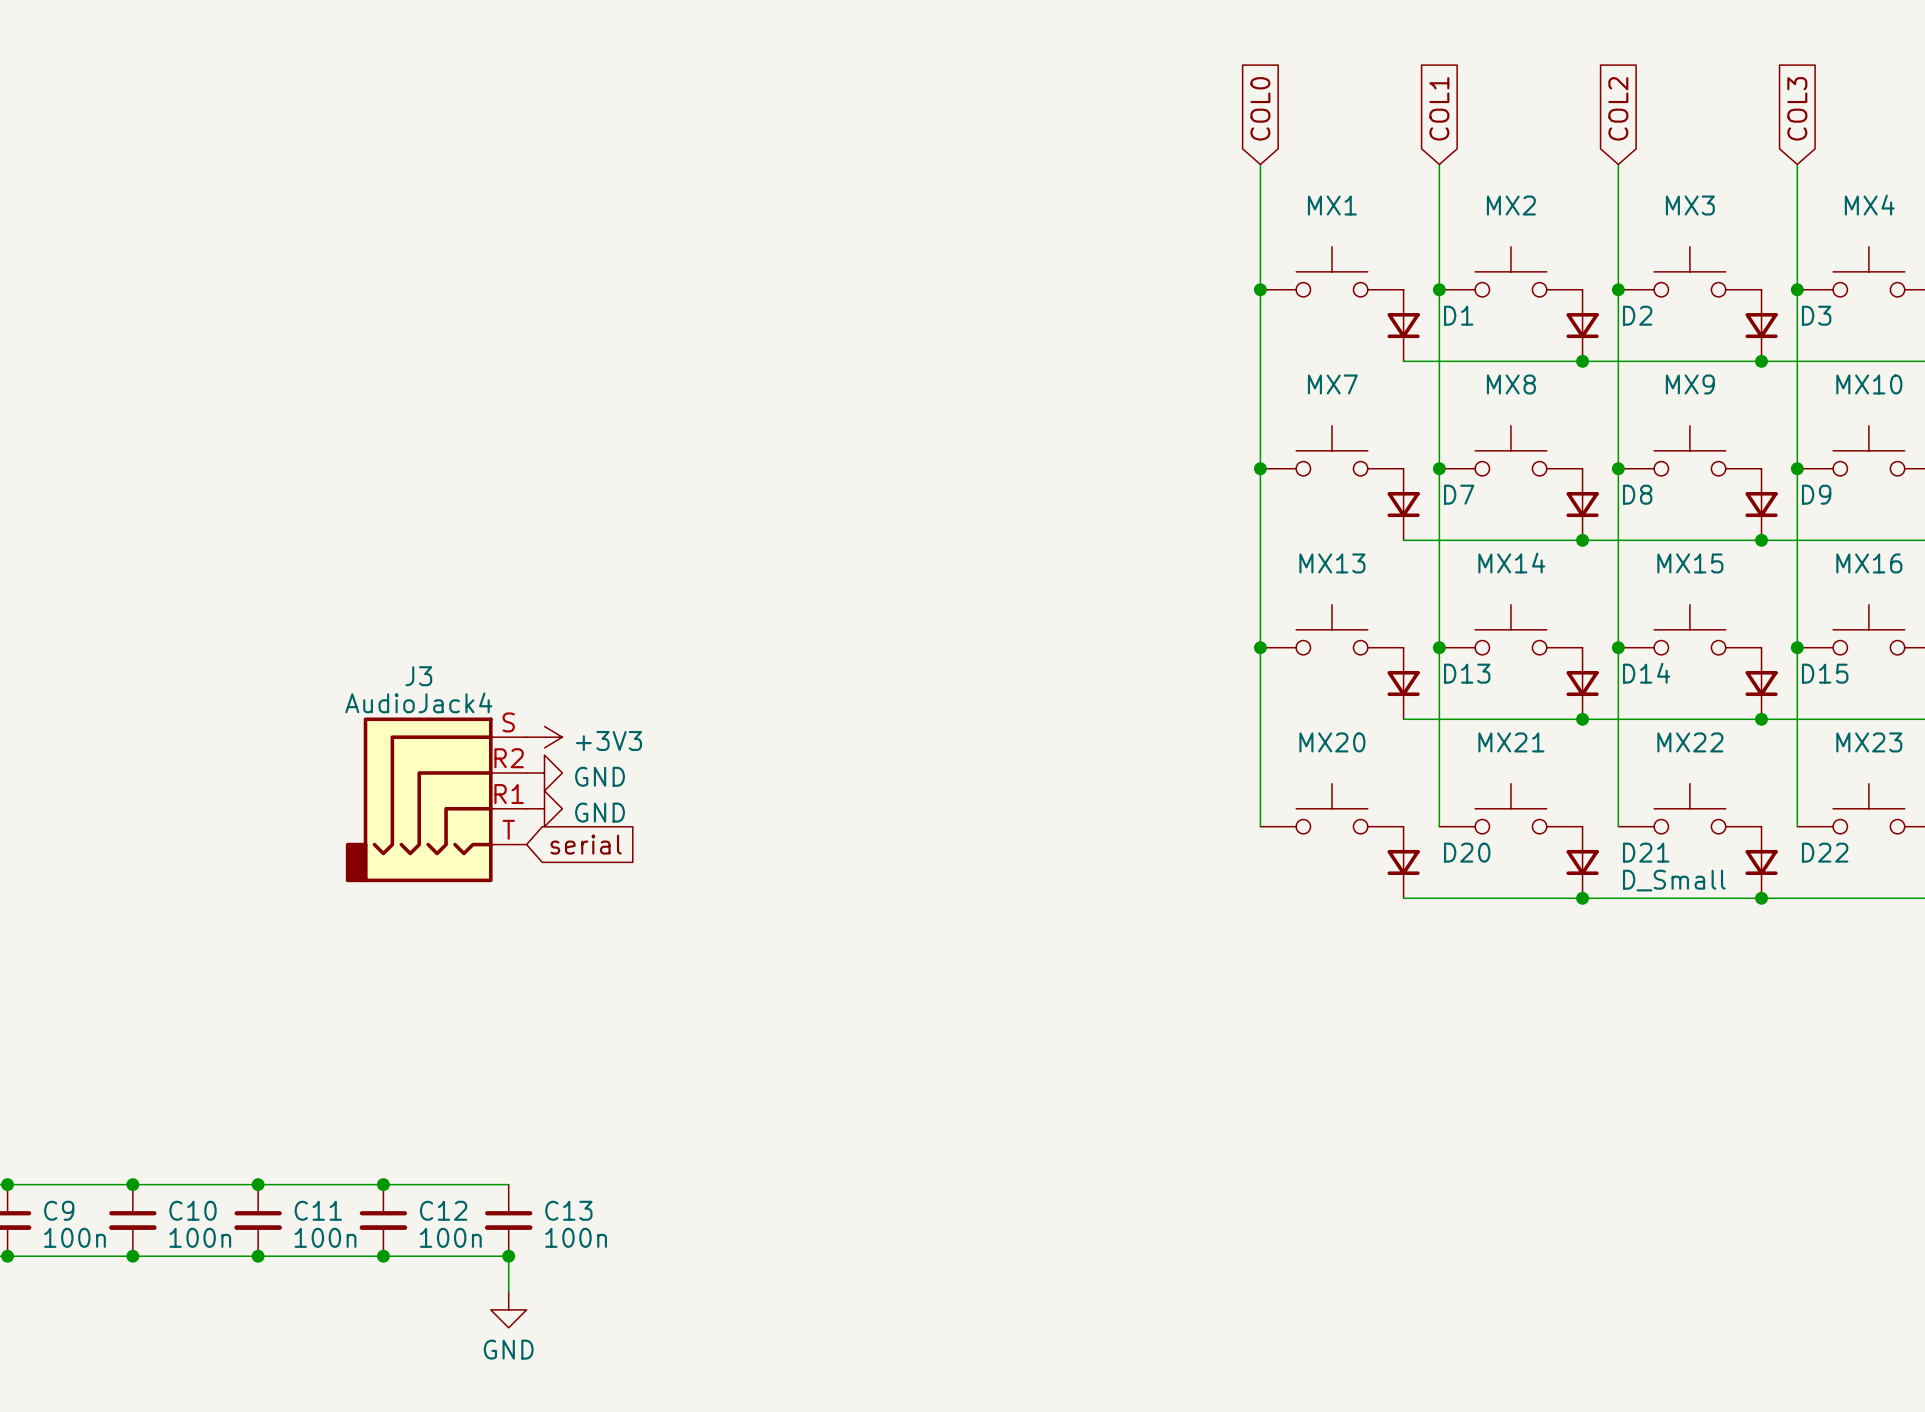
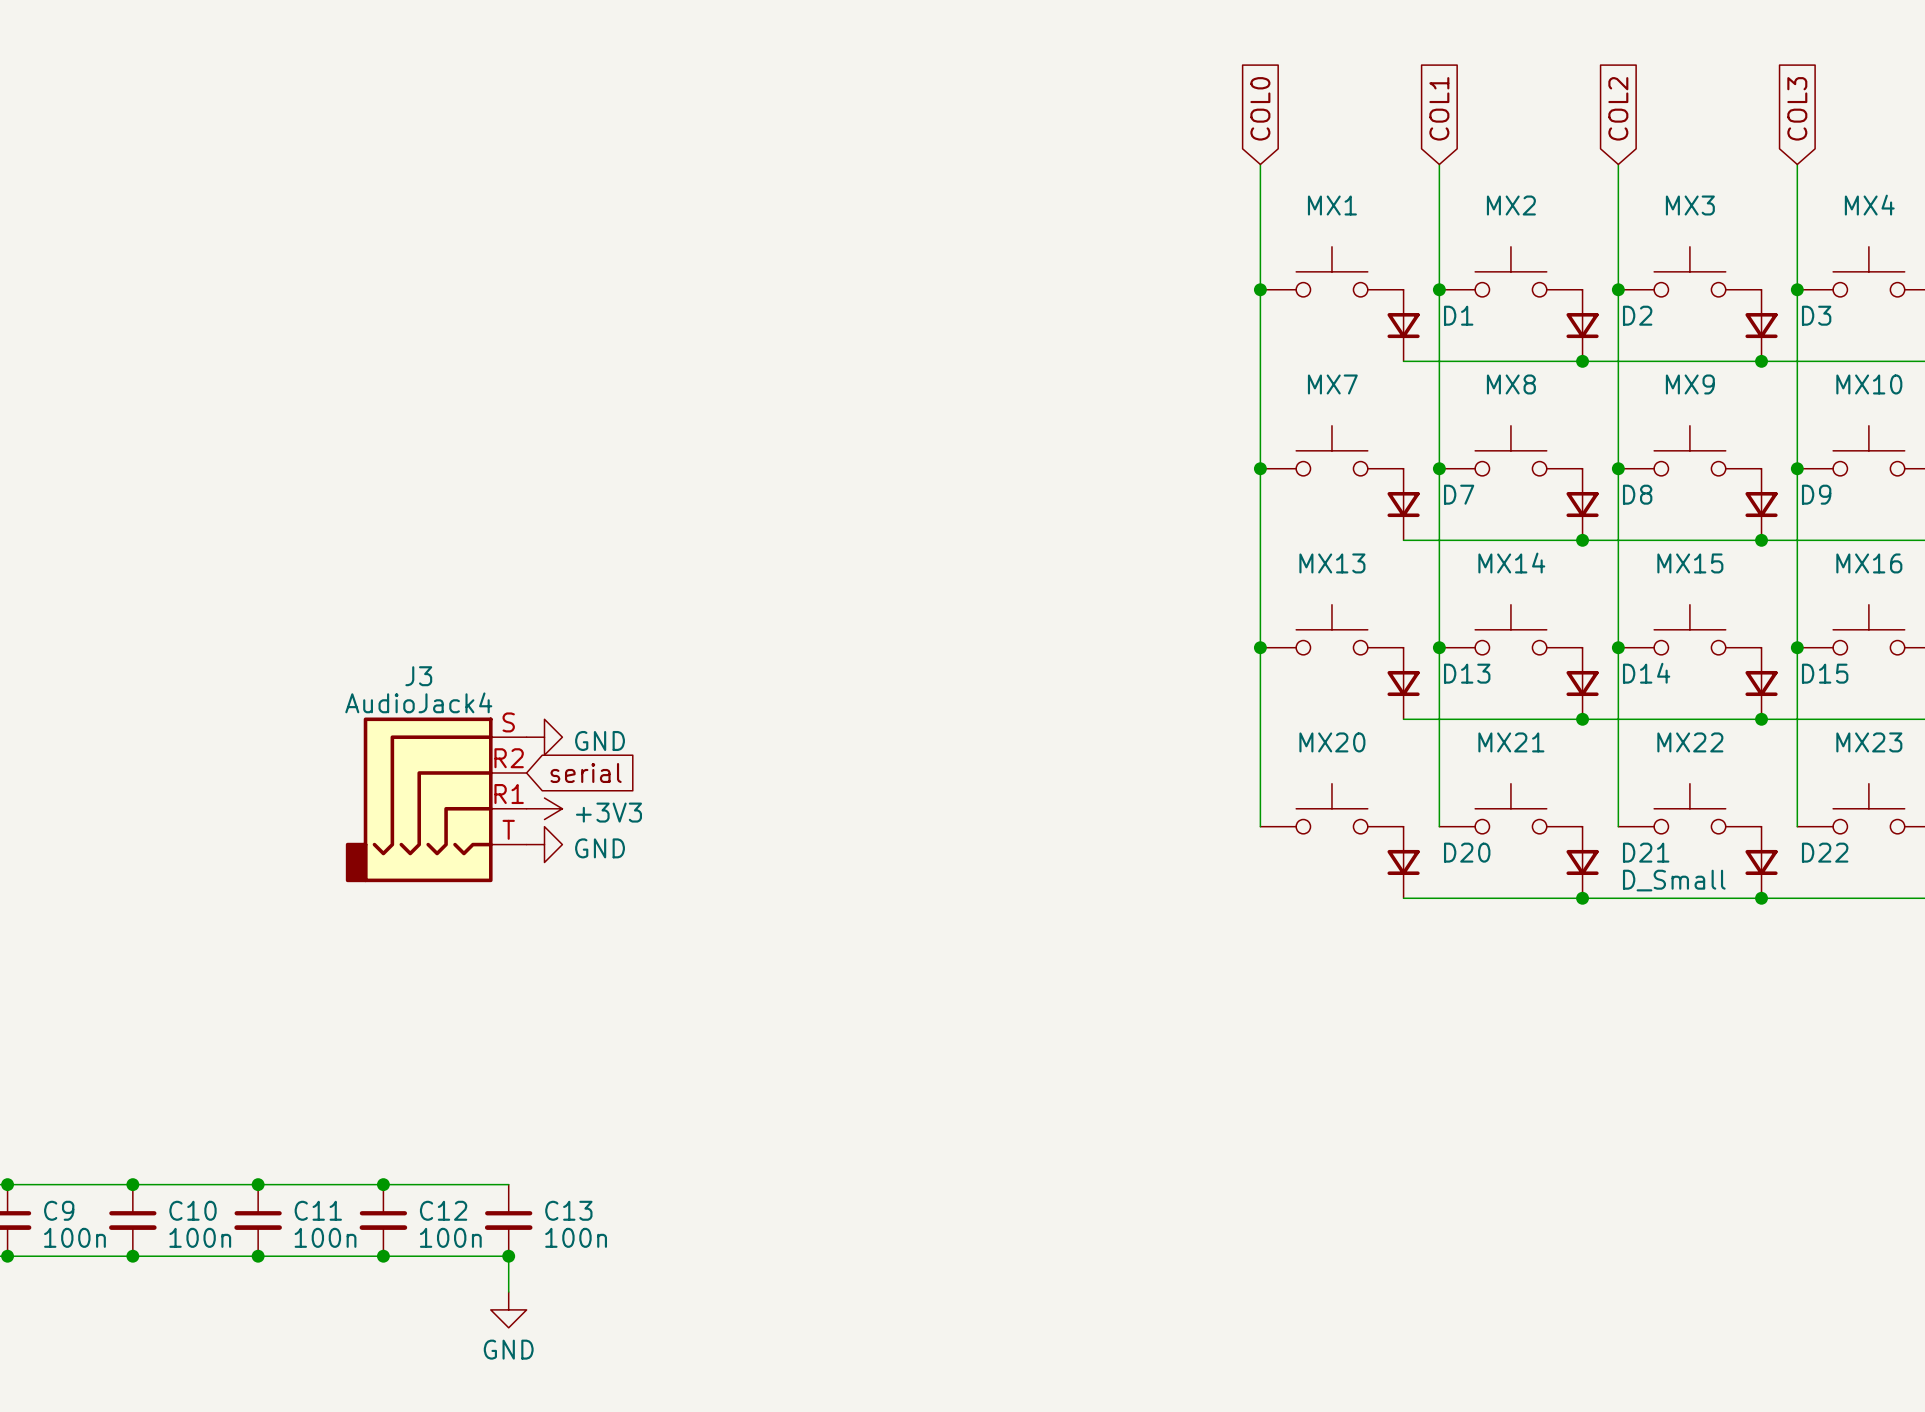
power symbol: +3V3 (544, 737) -> GND (544, 737)
power symbol position: GND (544, 772) -> GND (544, 844)
power symbol: GND (544, 808) -> +3V3 (544, 808)
global label position: serial (586, 844) -> serial (586, 772)

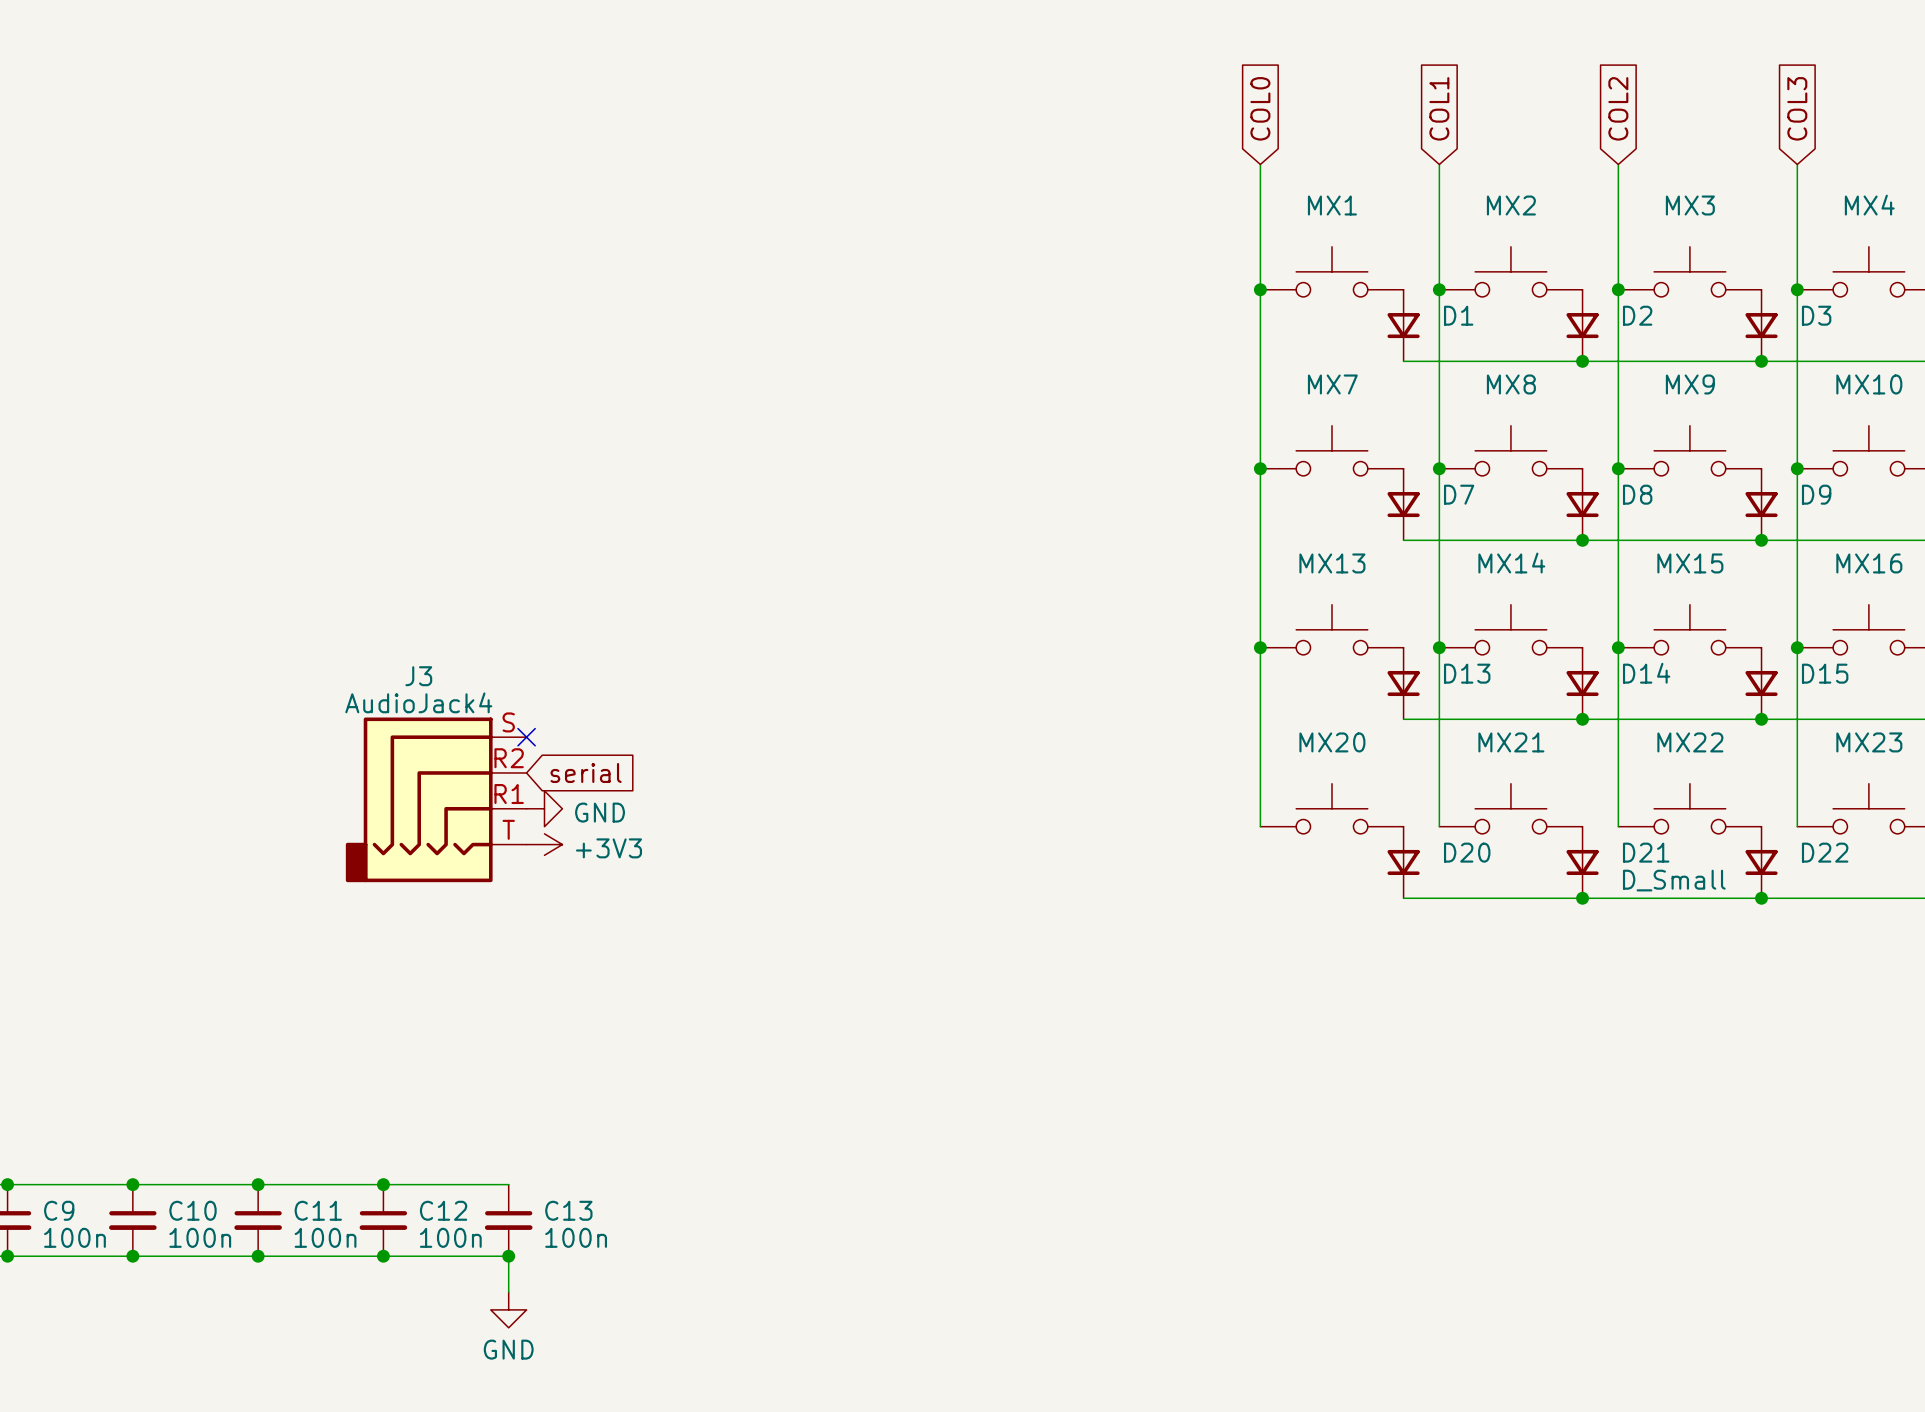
no-connect mark: none -> (526, 737)
power symbol: GND (544, 737) -> none
power symbol: +3V3 (544, 808) -> GND (544, 808)
power symbol: GND (544, 844) -> +3V3 (544, 844)

